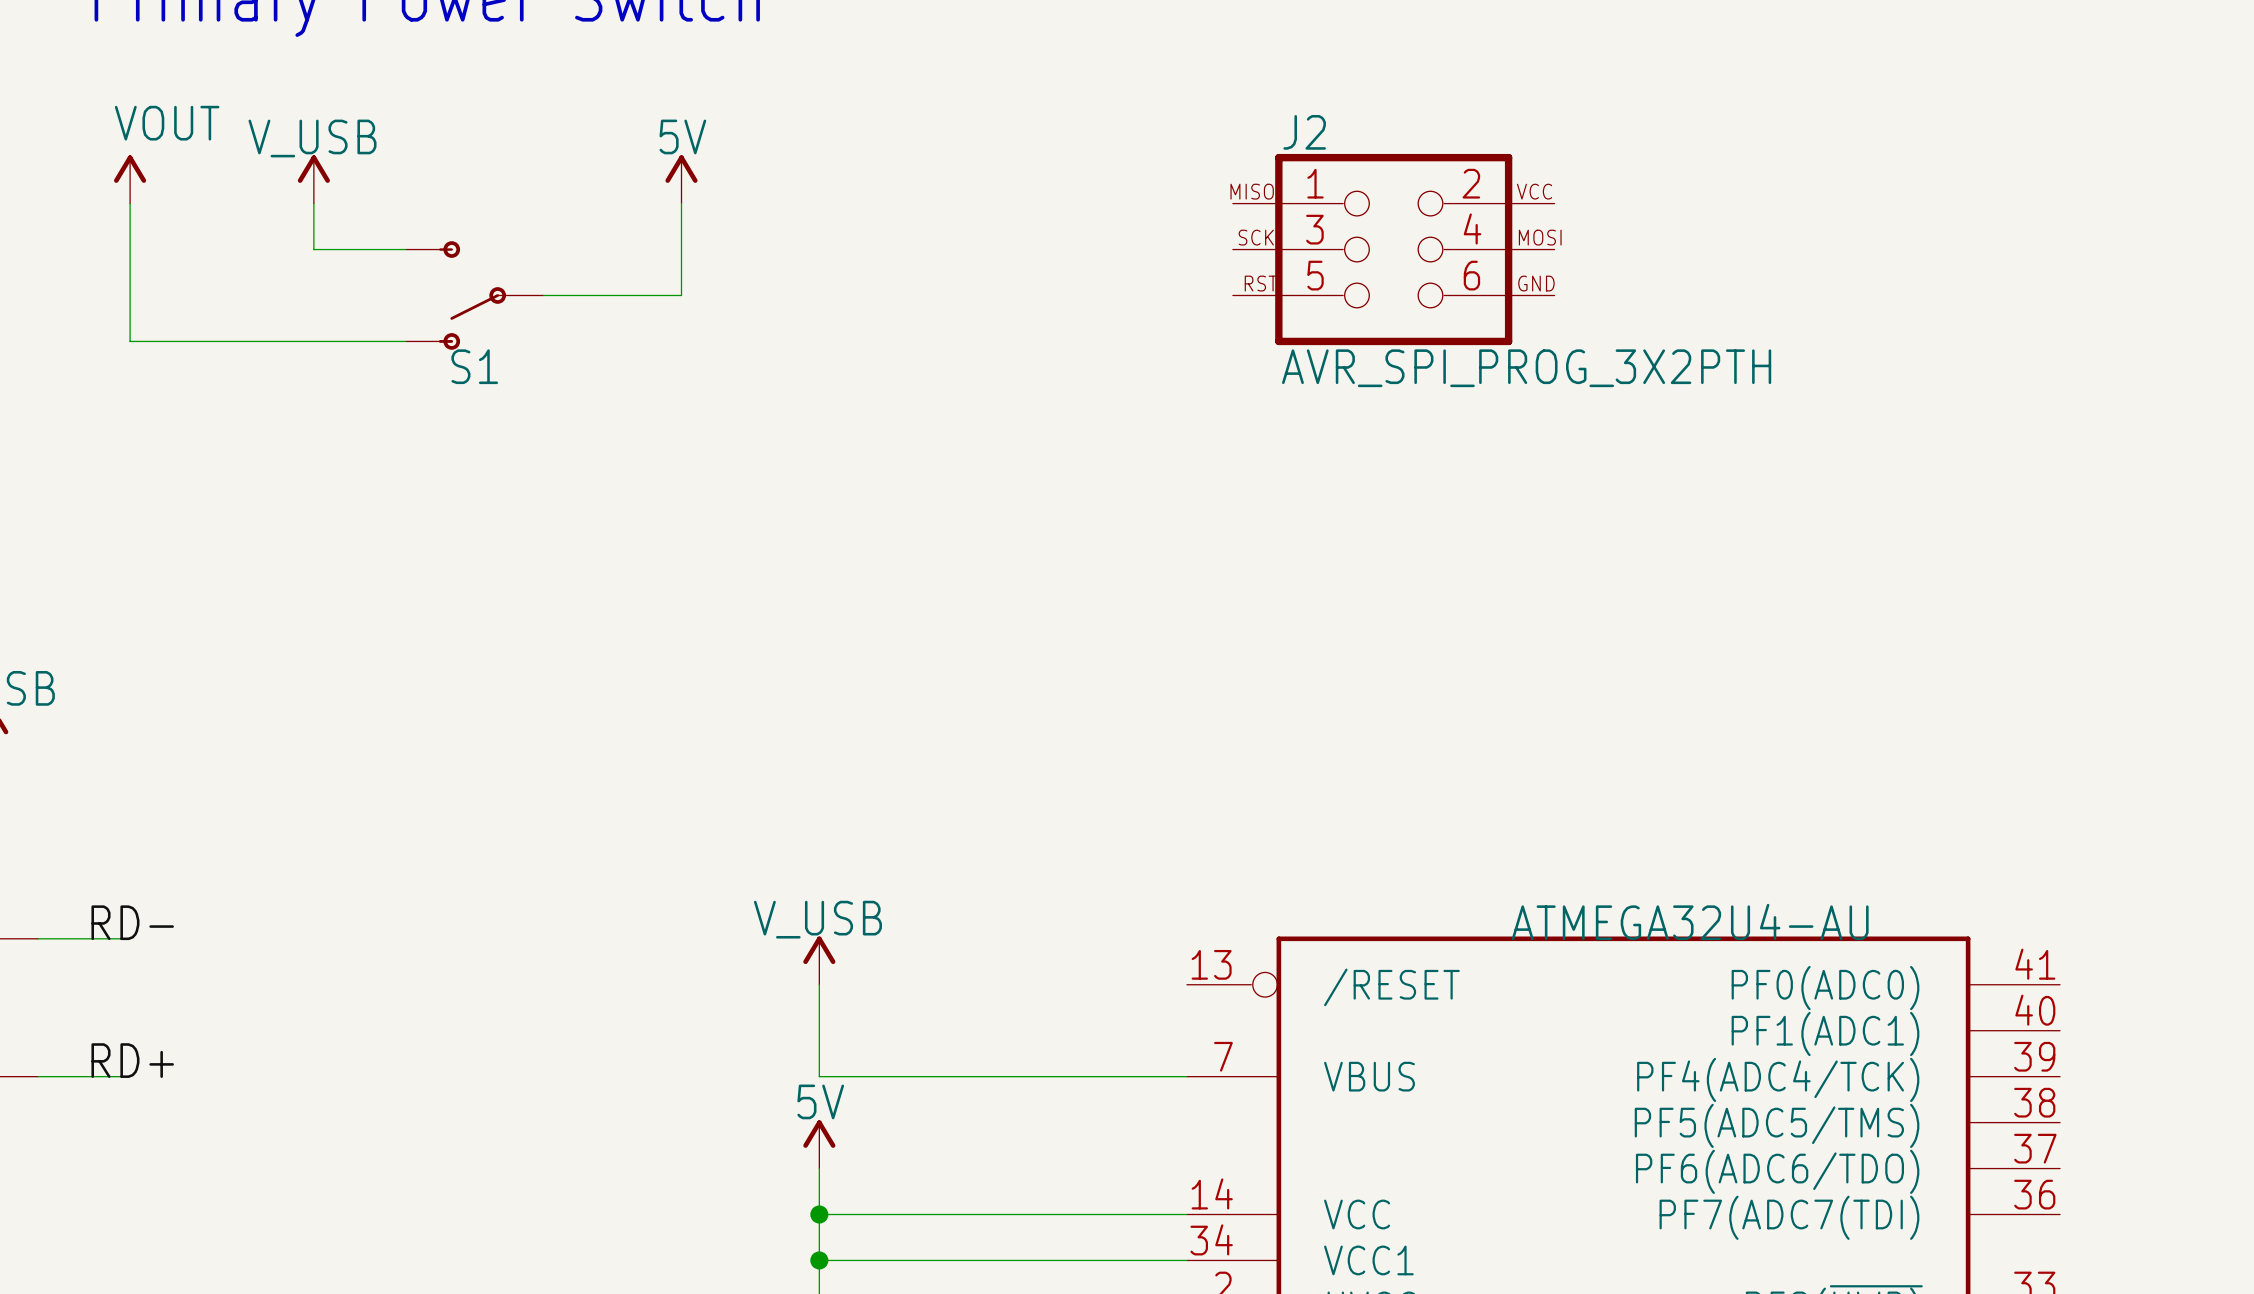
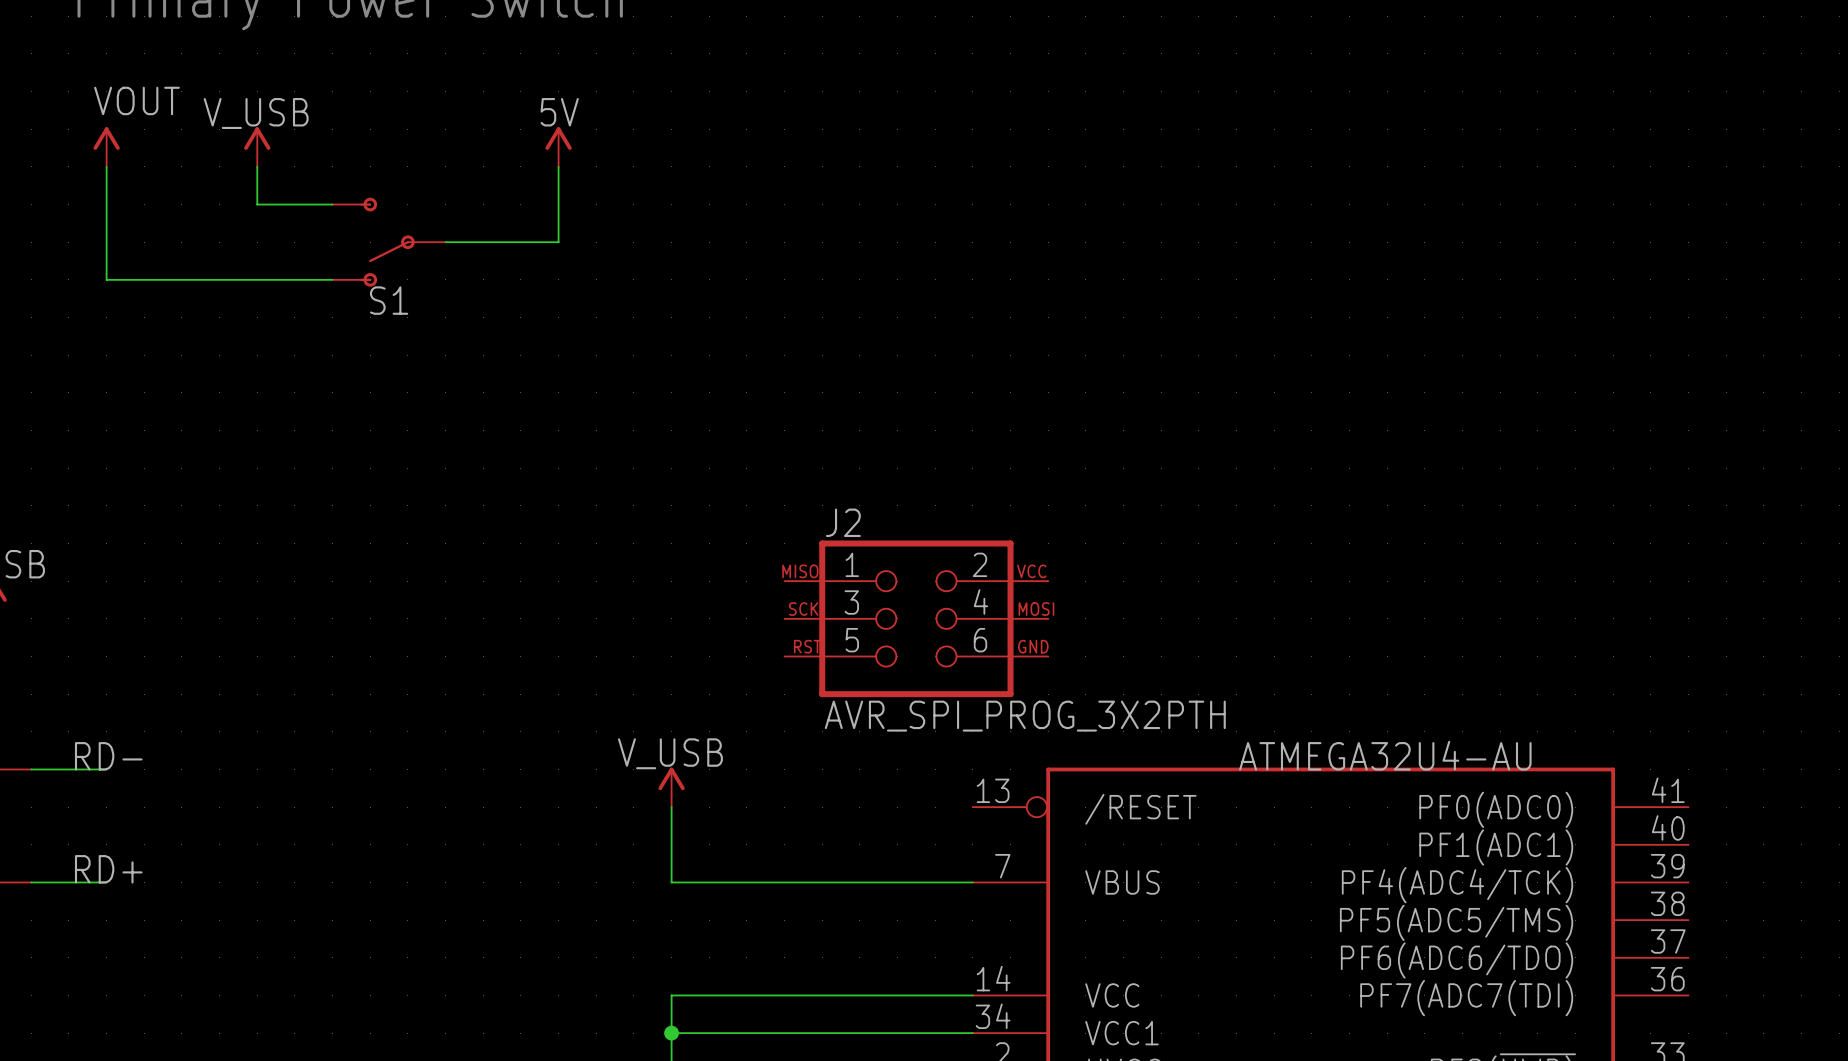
J2 position: (1393, 249) -> (916, 618)
power symbol: 5V (819, 1144) -> none
wire: (819, 1168) (819, 1214) -> none
junction: (819, 1214) -> none

